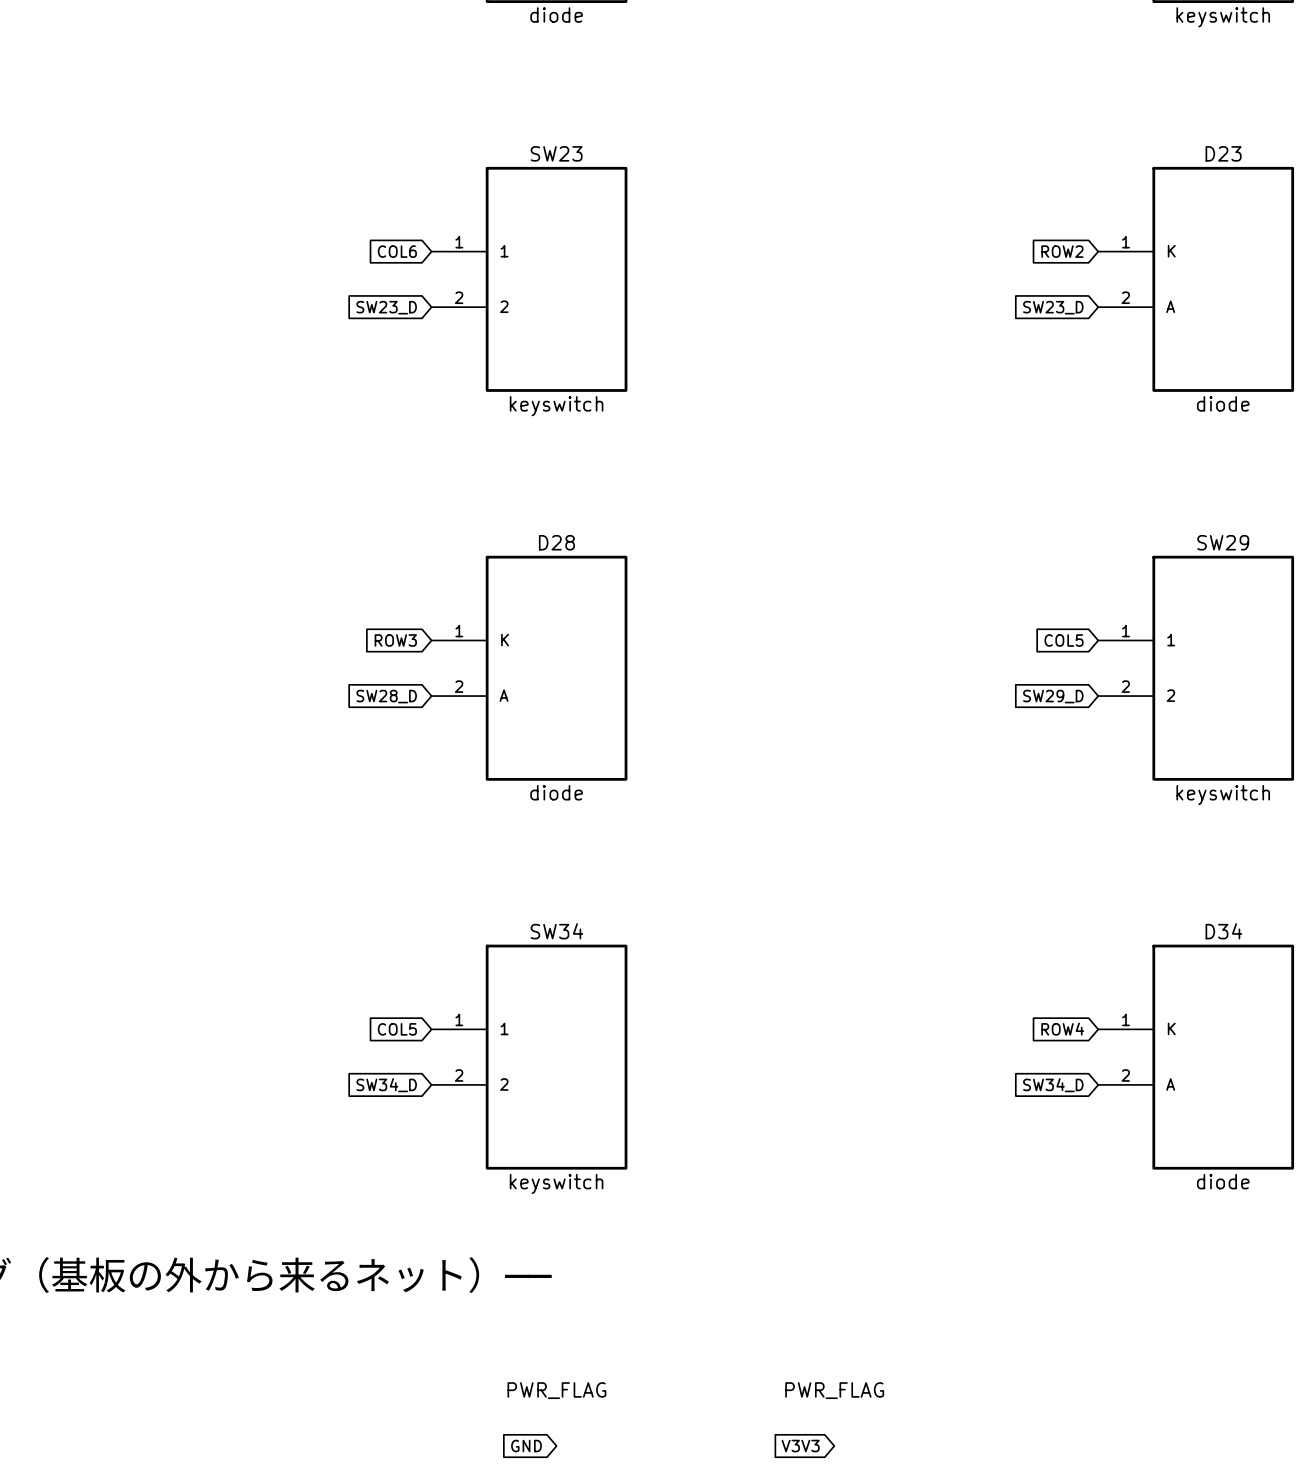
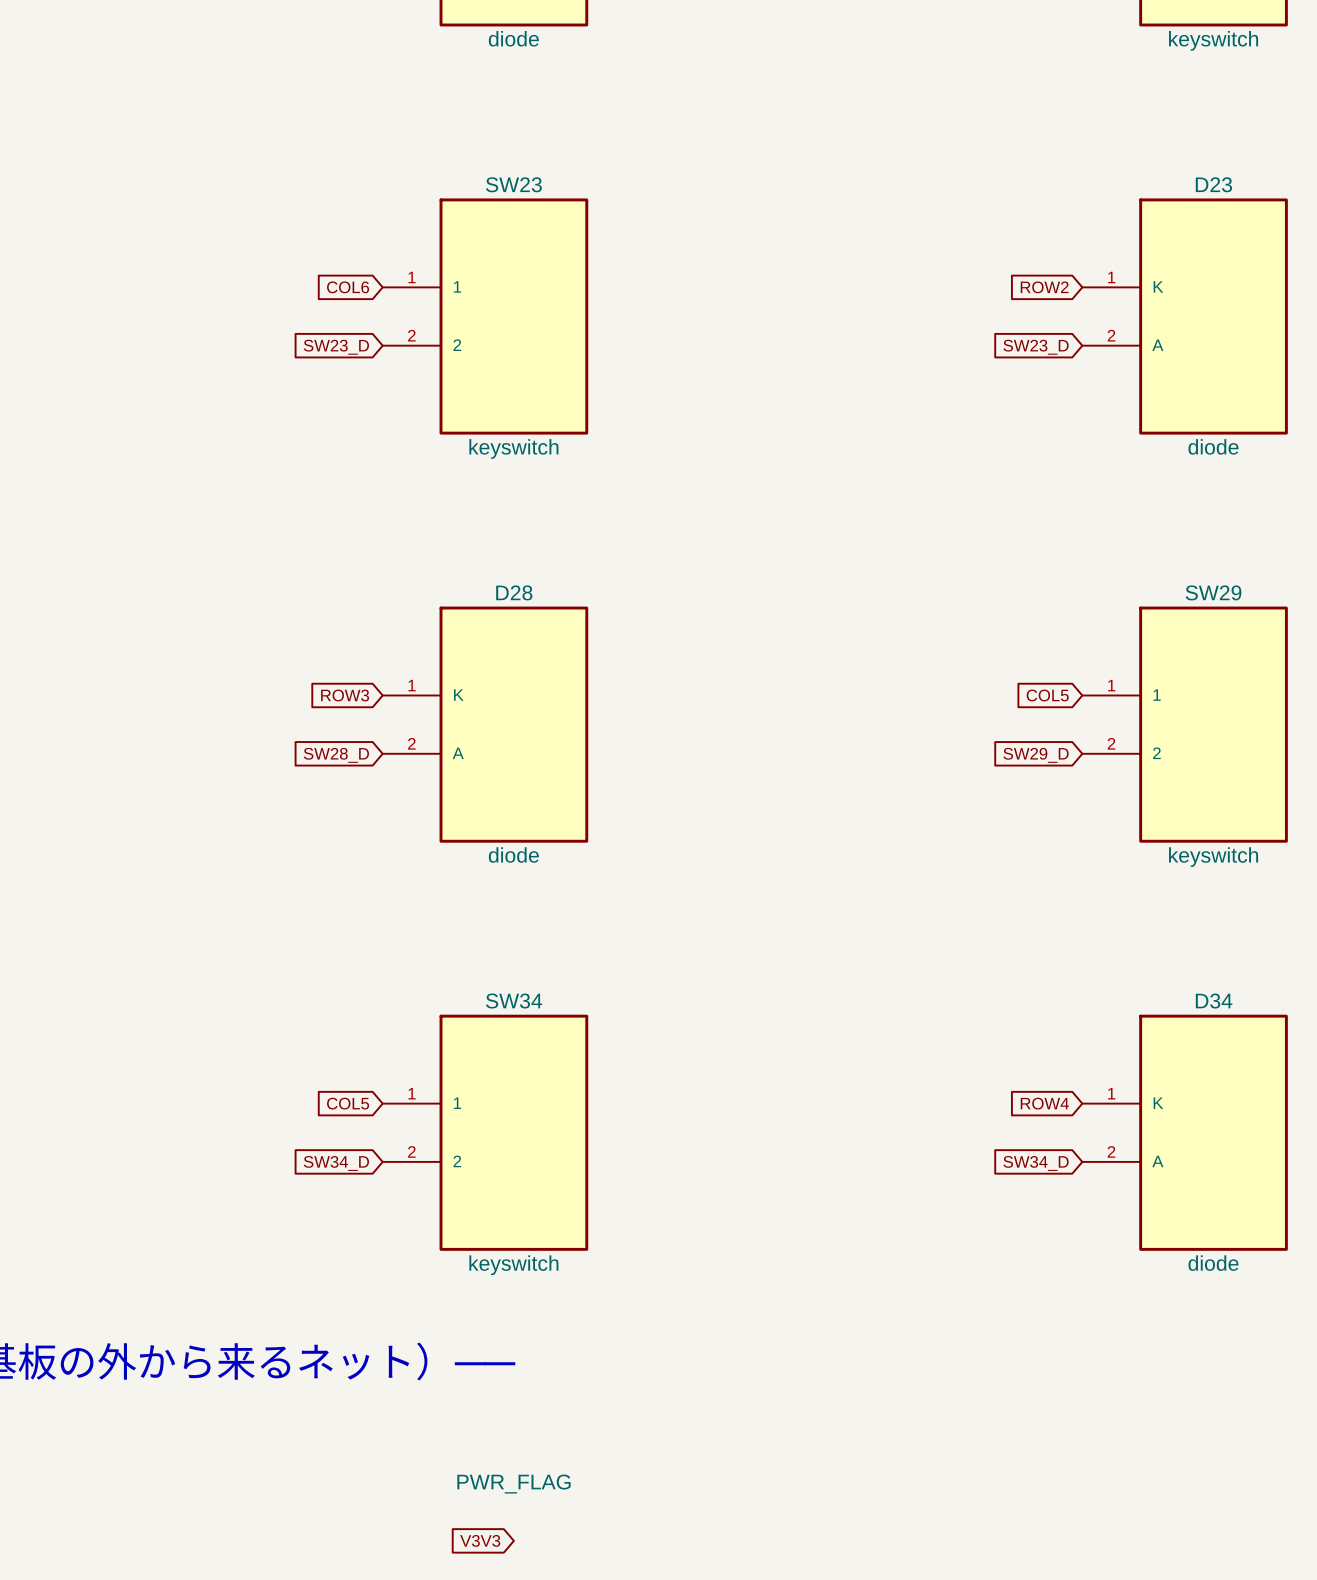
power symbol: PWR_FLAG (834, 1390) -> none
global label: GND (526, 1446) -> V3V3 (480, 1540)
global label: V3V3 (800, 1446) -> none

